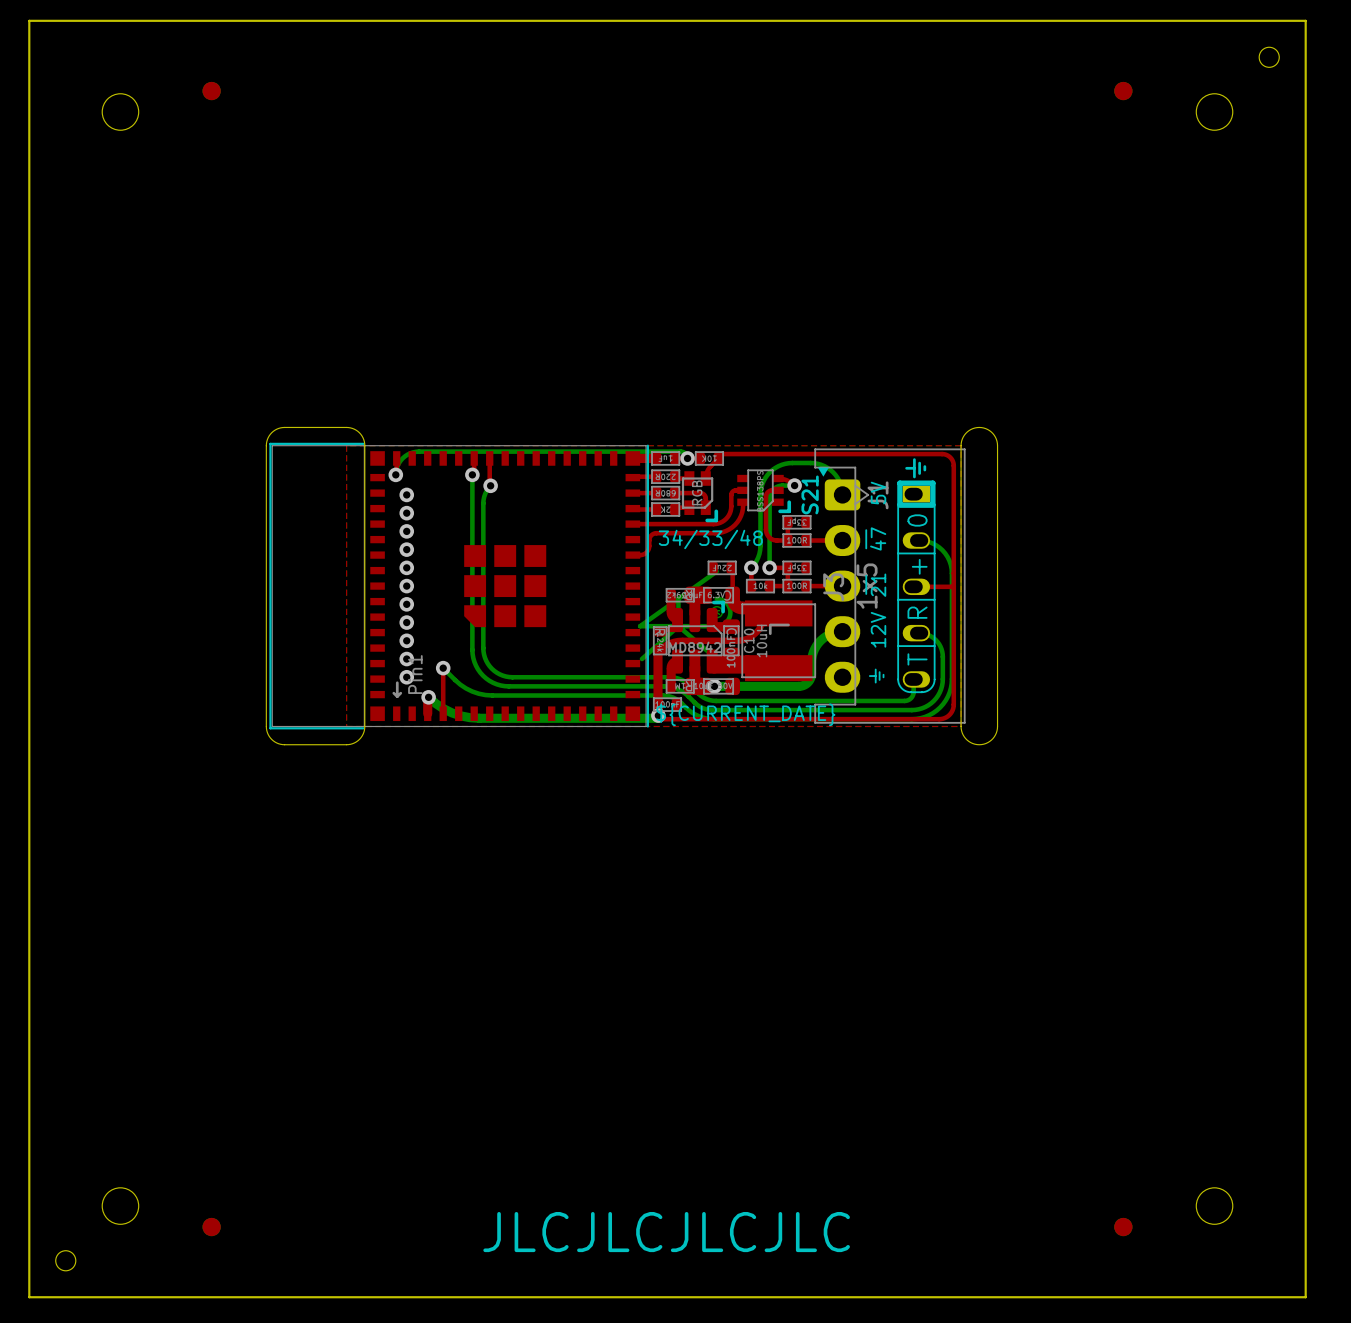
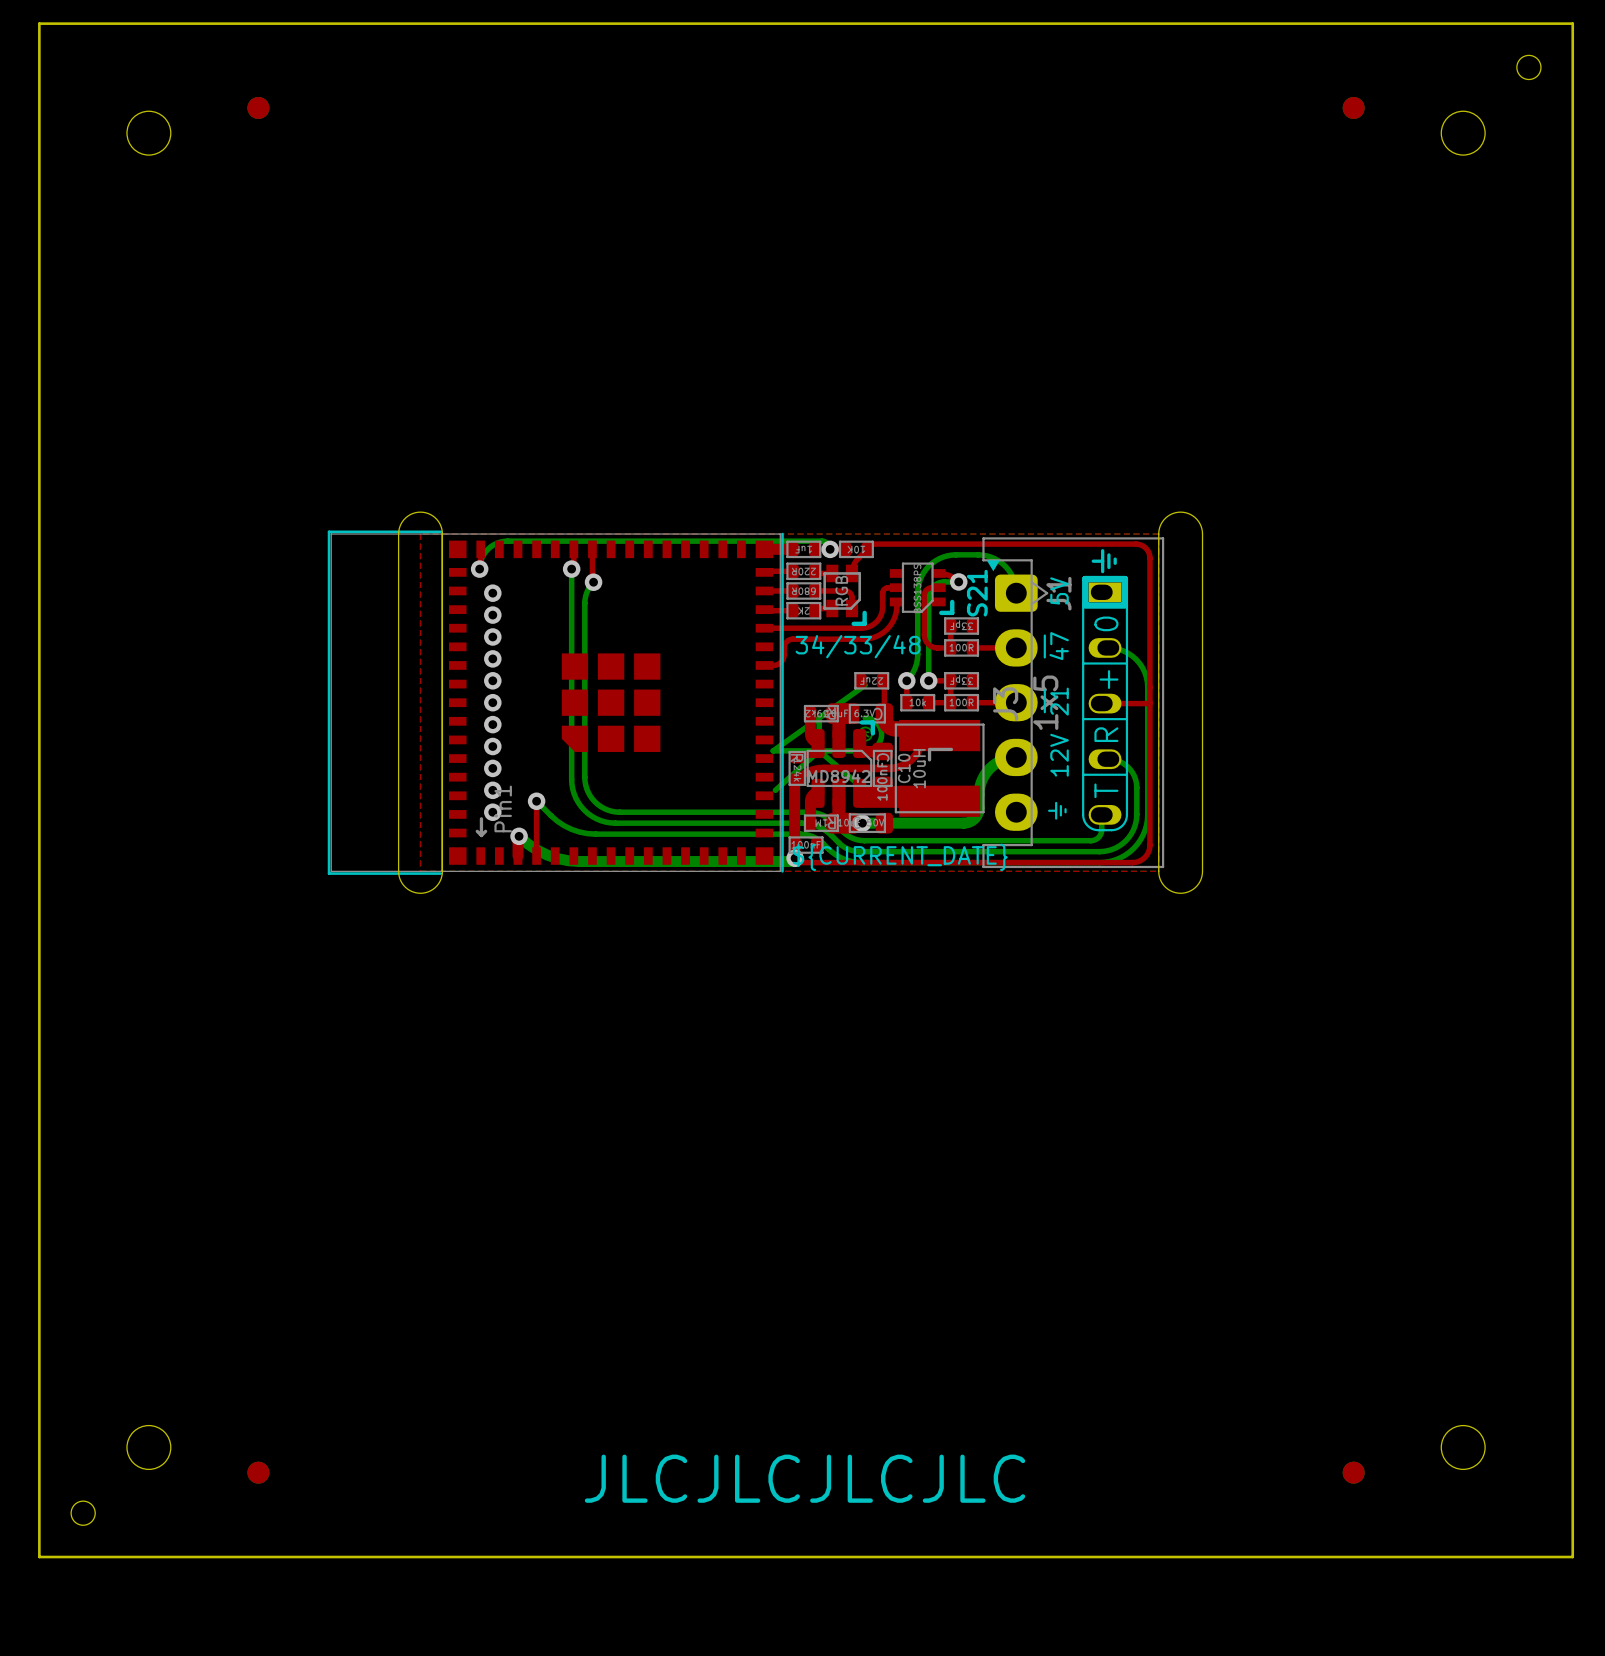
board edge: (364, 445) (359, 432) (346, 427) (280, 427) (270, 434) (266, 445) (267, 732) (273, 740) (282, 744) (348, 744) (360, 737) (364, 726) -> (442, 534) (439, 523) (435, 517) (420, 512) (410, 514) (404, 519) (398, 534) (398, 874) (405, 887) (420, 893) (428, 891) (436, 885) (442, 871)

